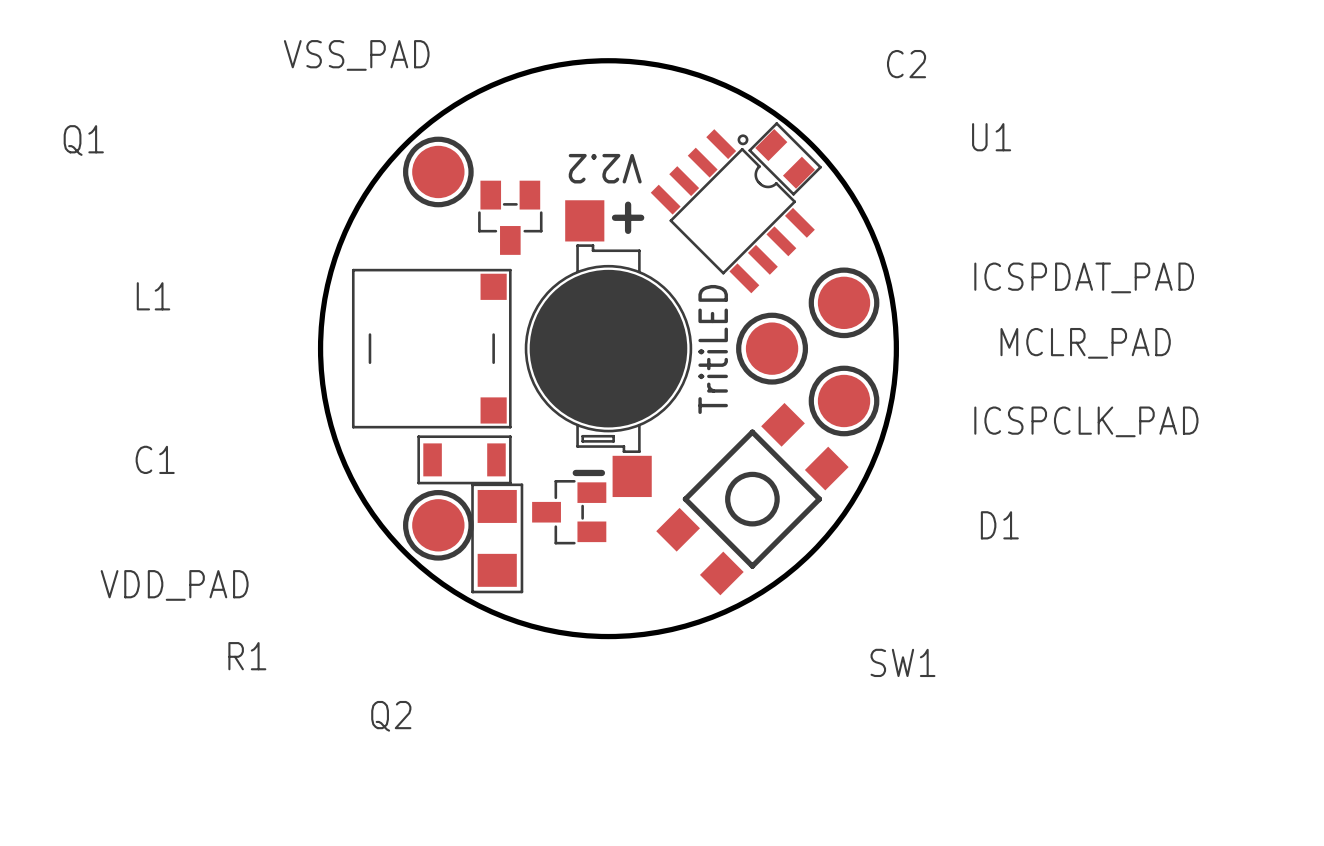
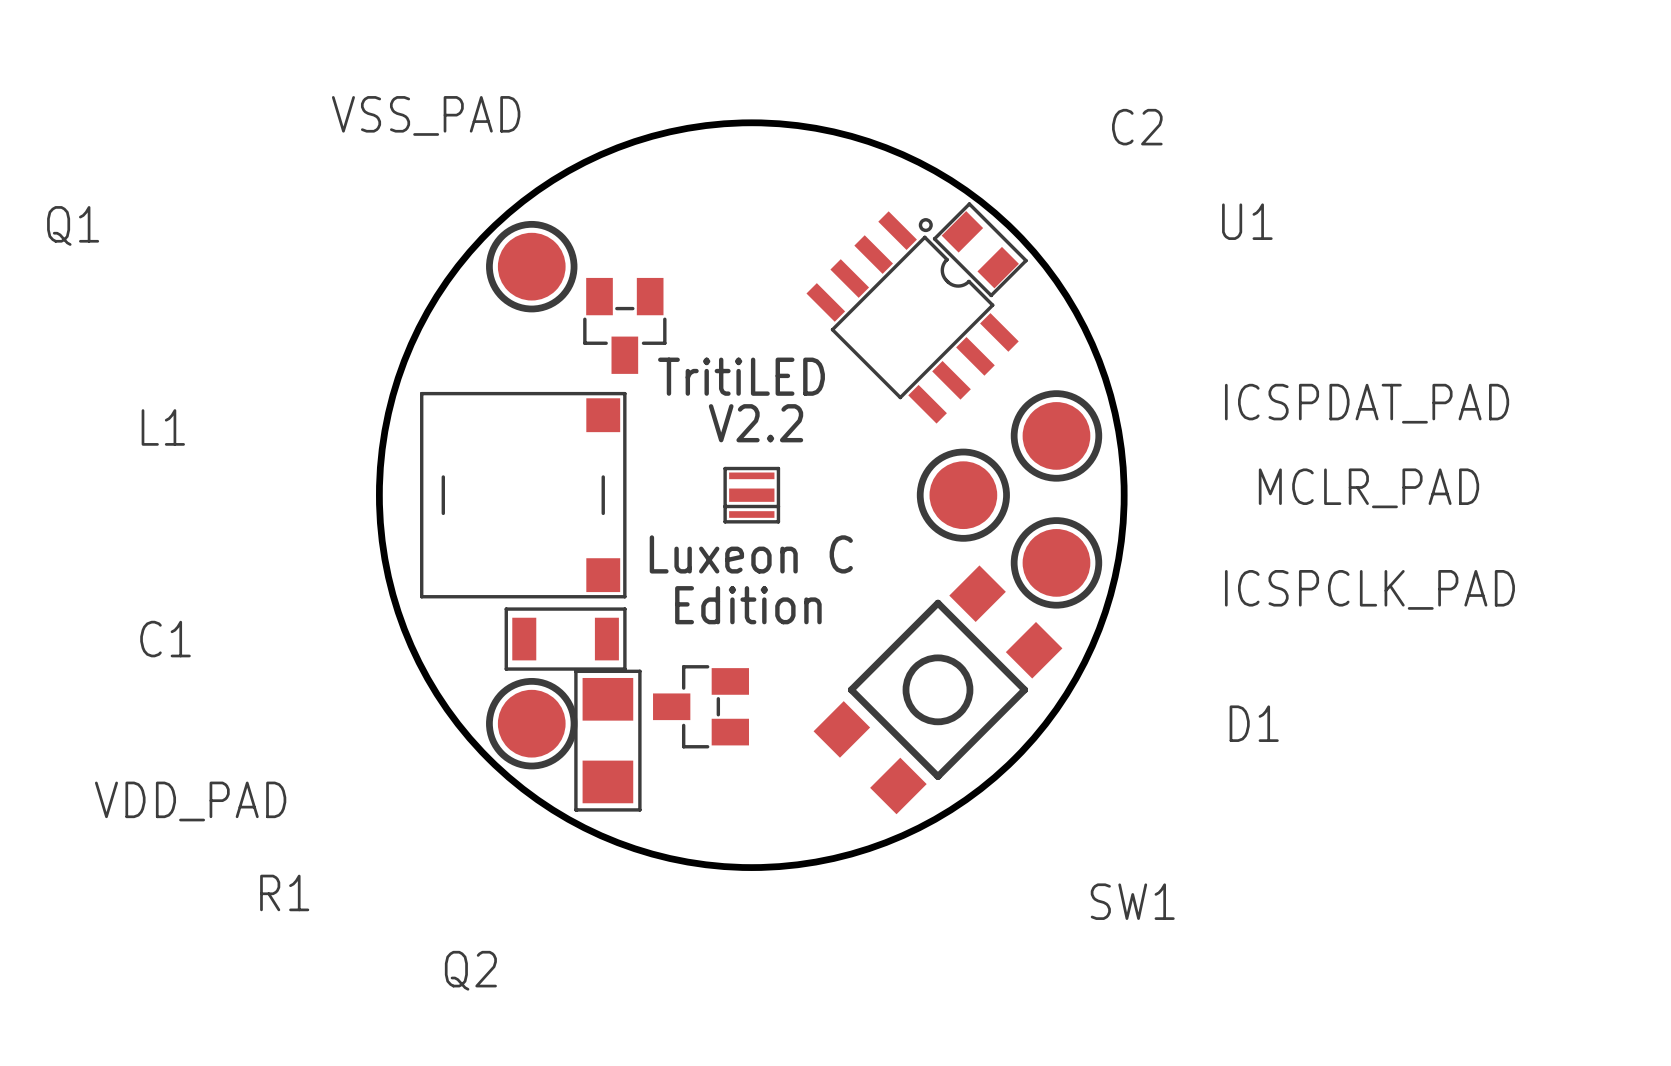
text rotation: 0° (605, 168) -> 180° (756, 423)
text position: V2.2 (605, 168) -> V2.2 (756, 423)
D1 footprint: [524, 200, 693, 498] -> [723, 466, 781, 524]
line: (628, 204) (628, 230) -> none
line: (615, 217) (641, 217) -> none
drawing: [529, 269, 688, 428] -> none
text rotation: 0° (713, 349) -> 90° clockwise (741, 376)
text: none -> Luxeon C (751, 554)
text: none -> Edition (748, 605)
line: (575, 472) (601, 472) -> none

